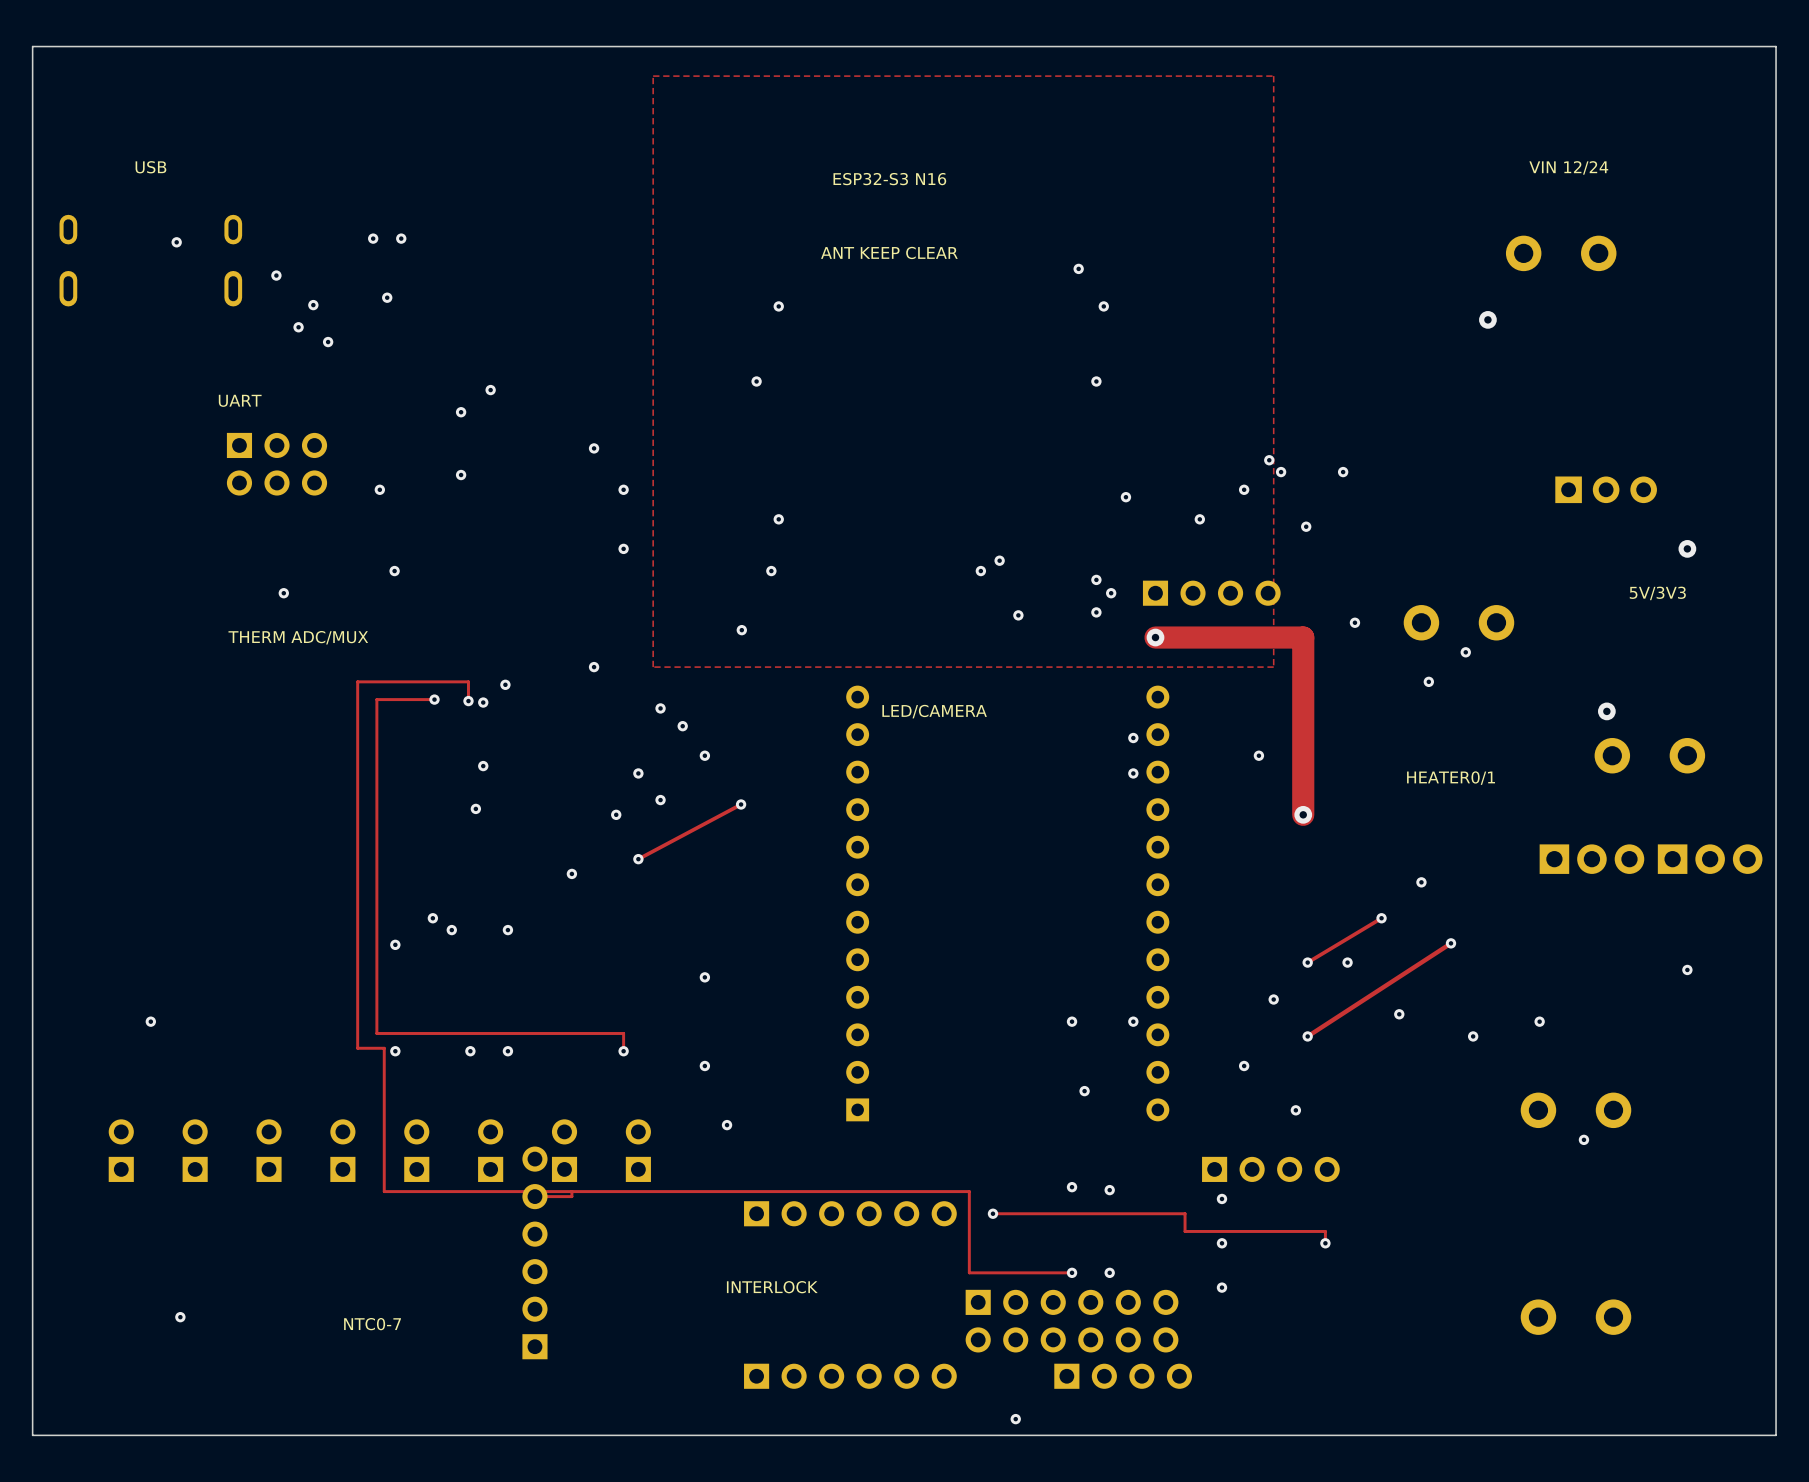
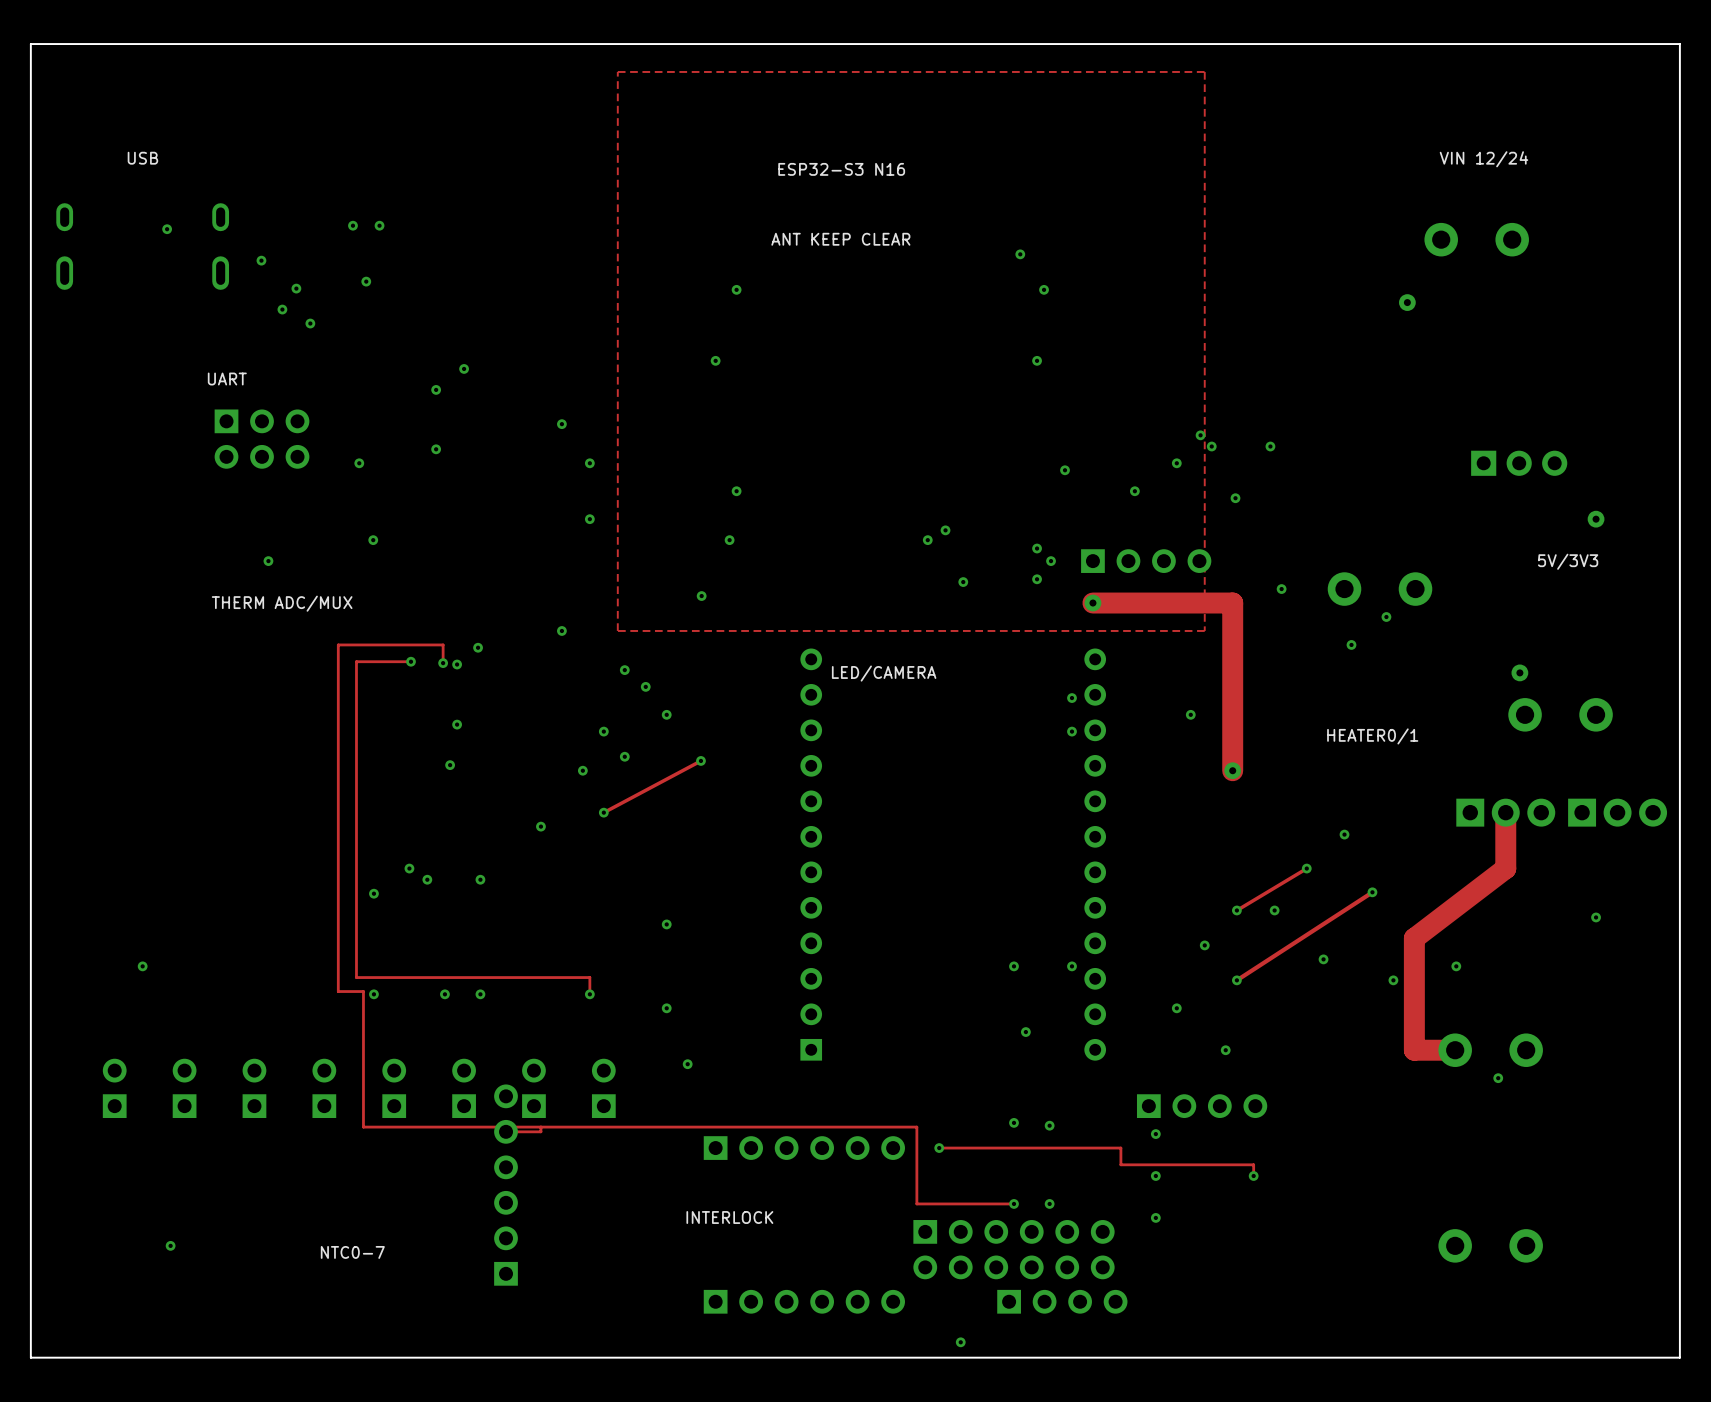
track: none -> (1505, 812) (1505, 868) (1414, 938) (1414, 1050) (1455, 1050)

